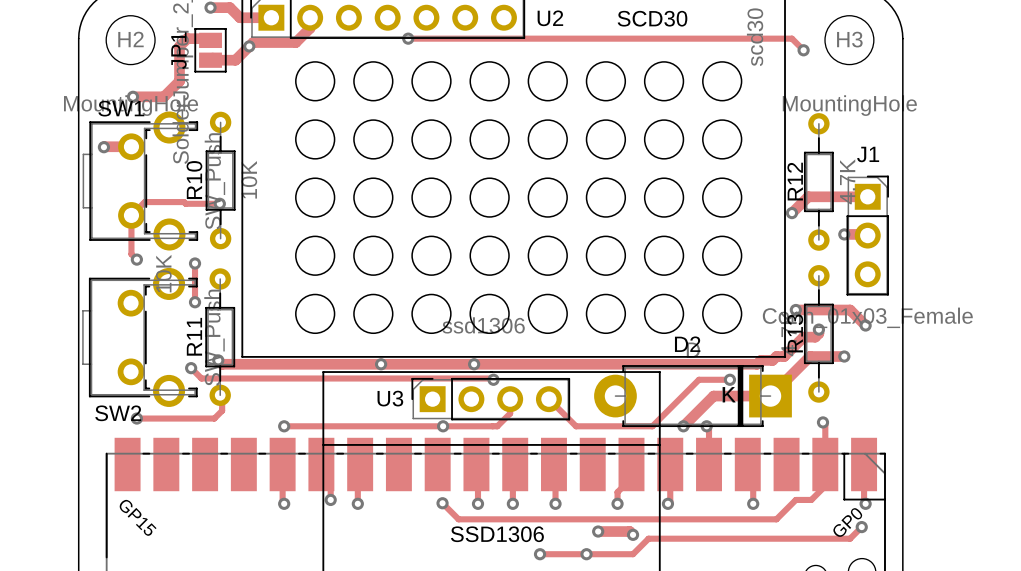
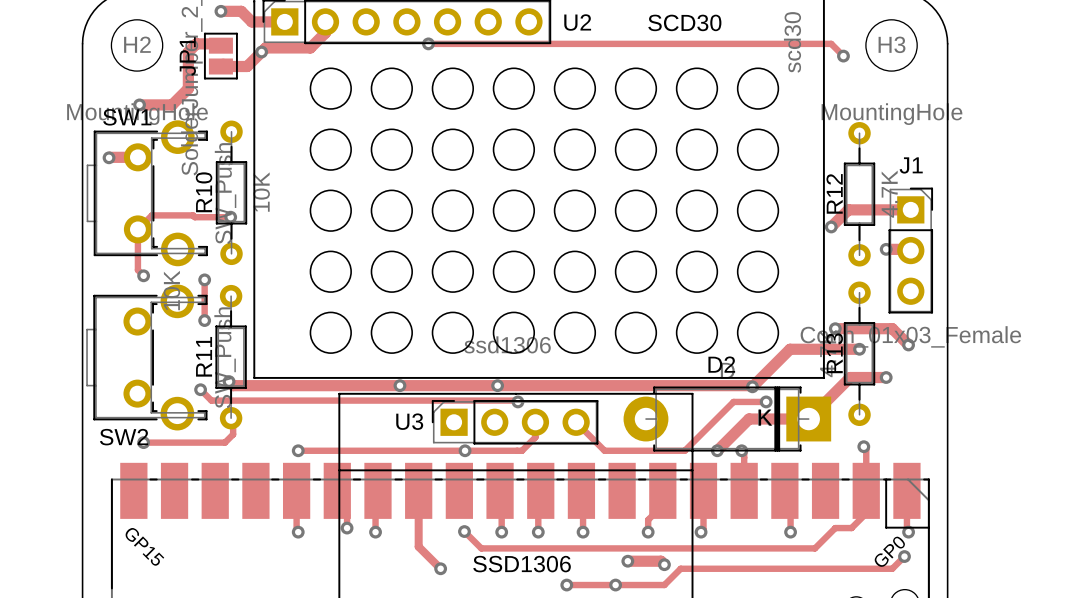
track: (818, 329) (818, 333) (815, 337) (803, 337) (784, 356) (776, 356) (772, 360) (760, 360) (757, 364) (715, 364) -> (859, 349) (790, 349) (752, 386)
via: none -> (752, 386)
track: none -> (418, 505) (418, 546) (440, 568)
via: none -> (440, 568)

